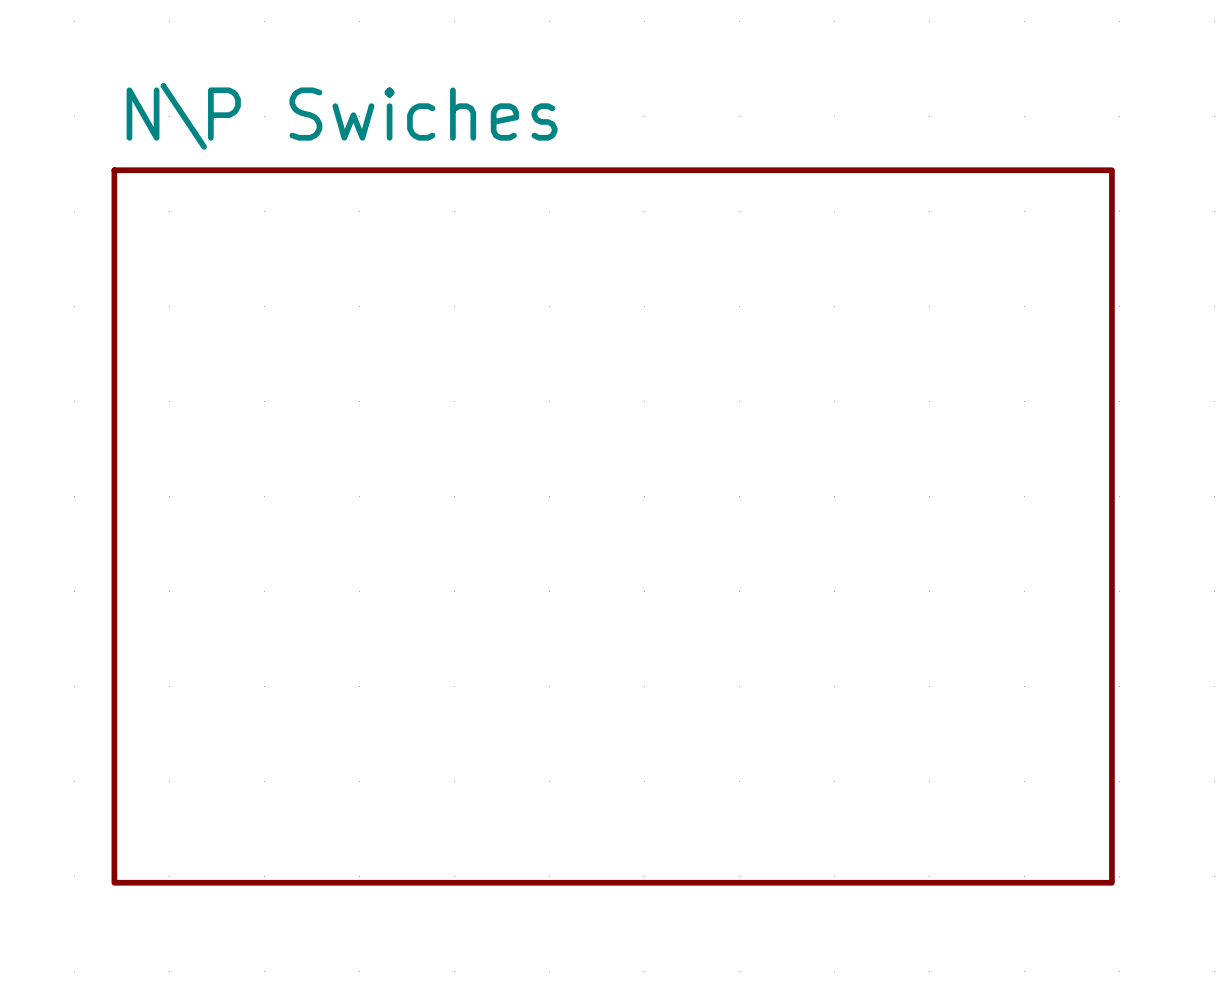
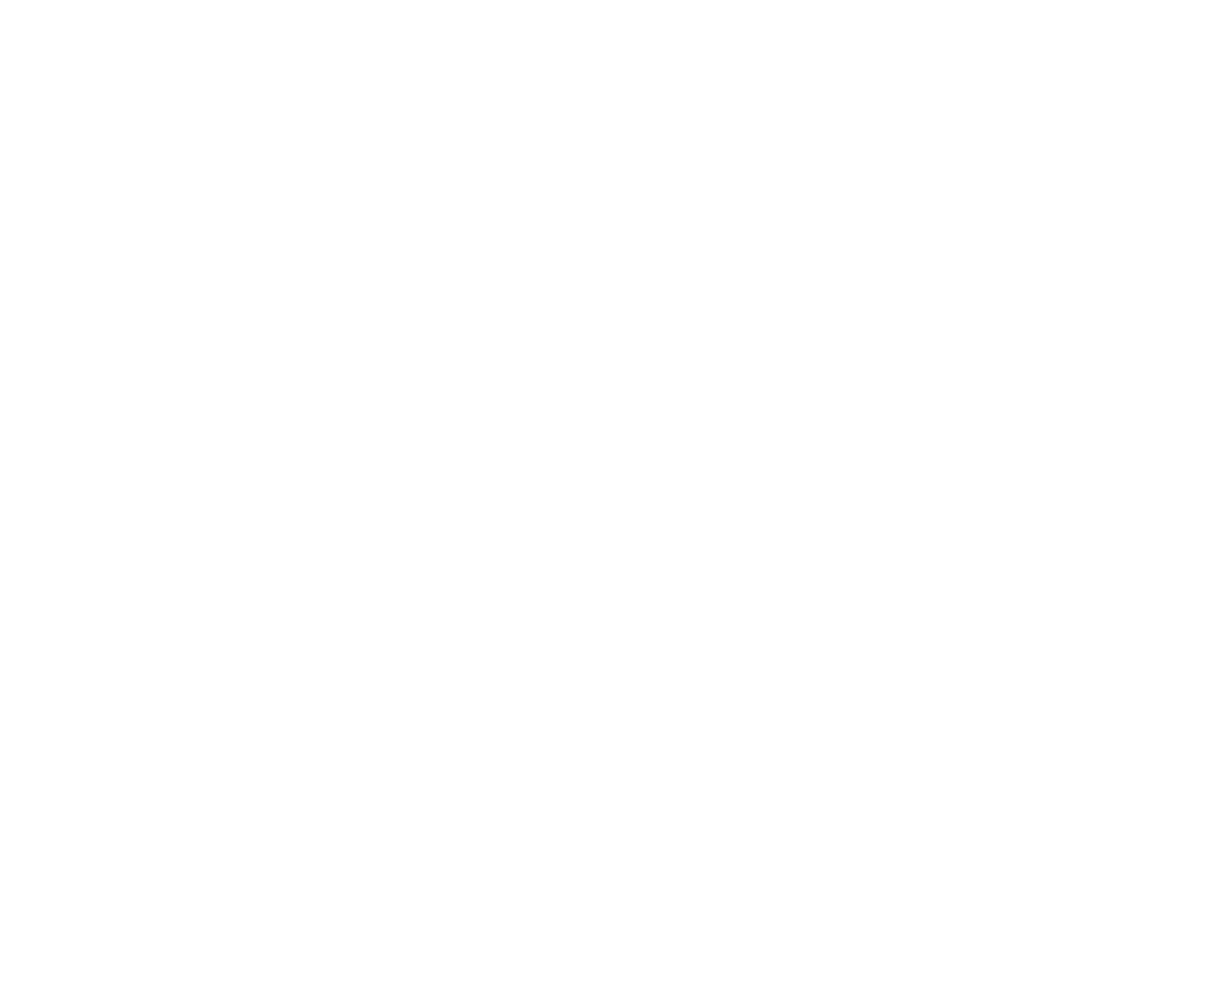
sheet N\P Swiches: (613, 526) -> none

